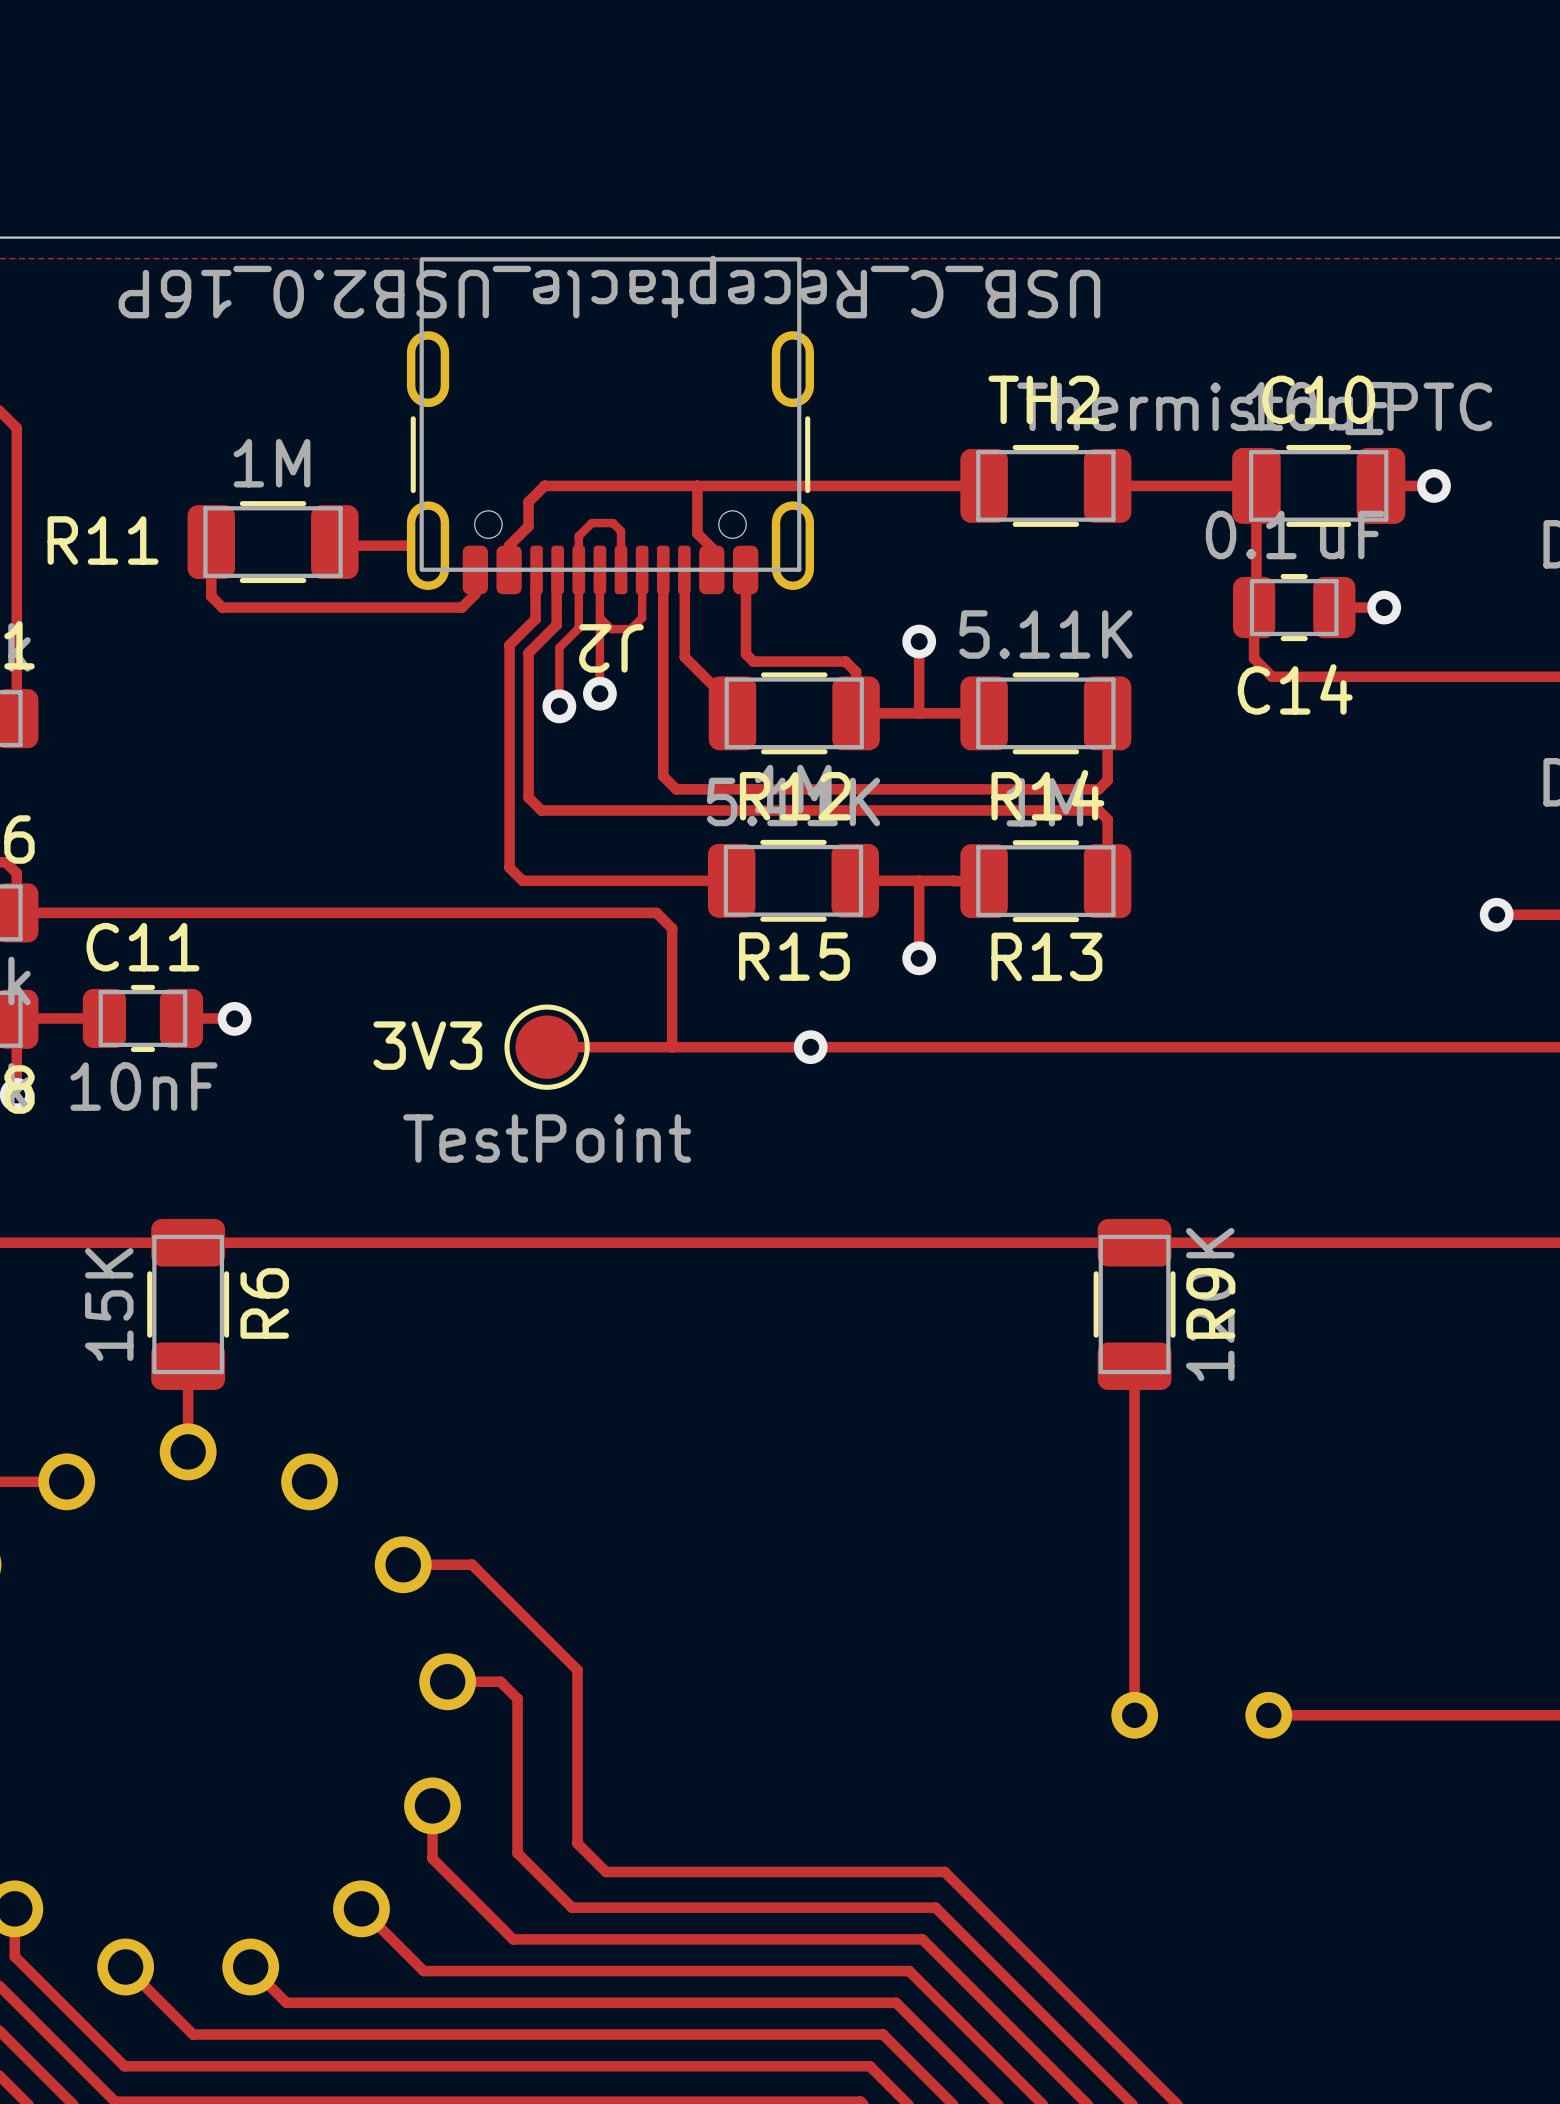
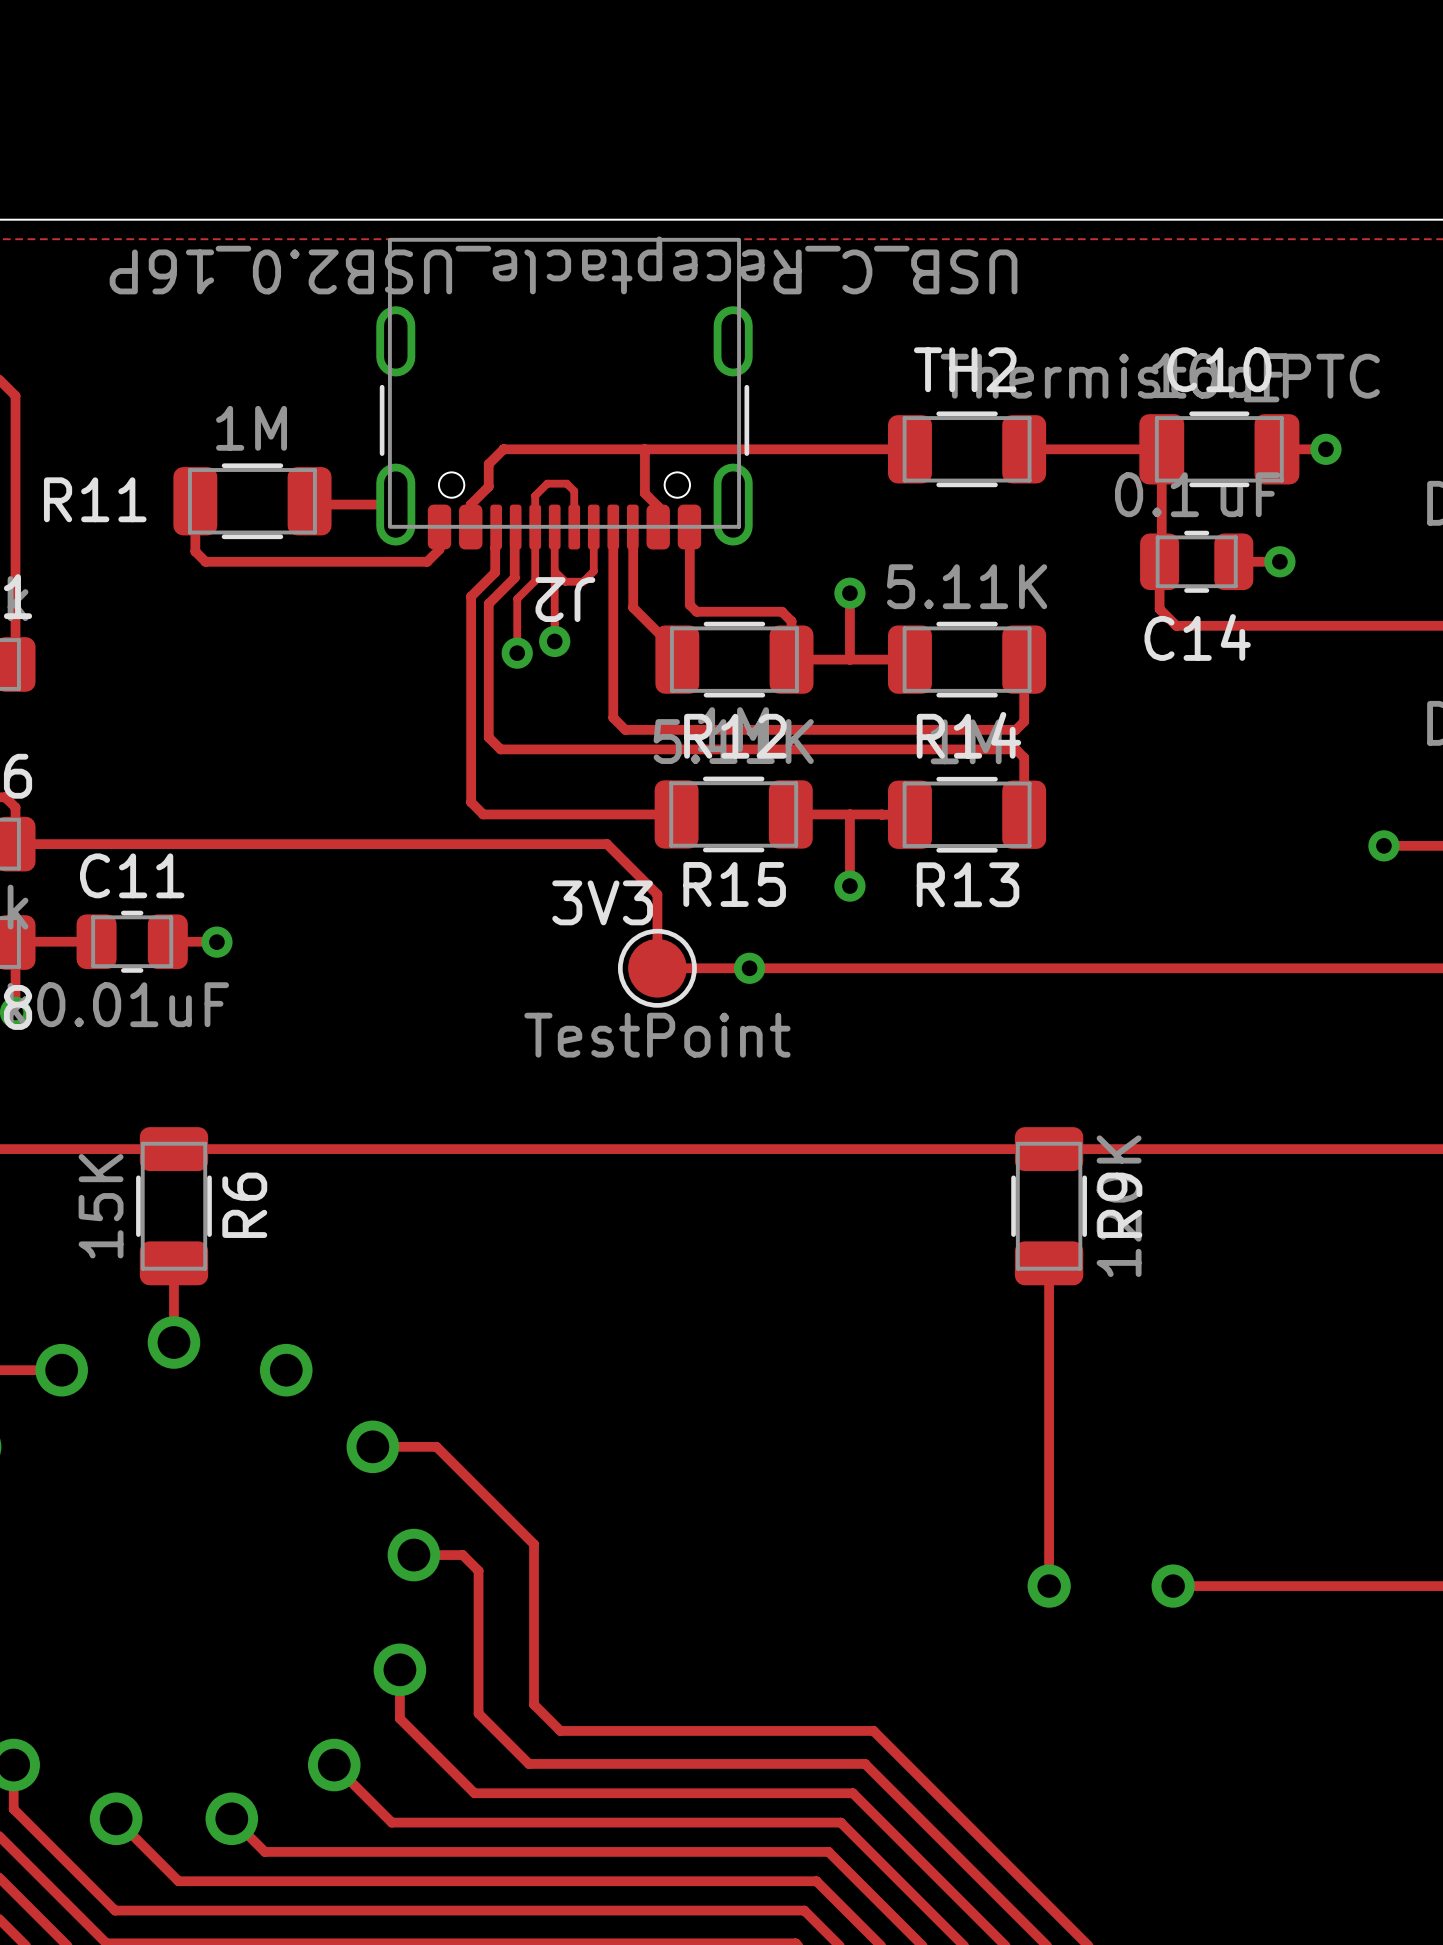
track: (672, 928) (672, 1047) -> (621, 858) (657, 894) (657, 968)
3V3 name position: 3V3 (427, 1045) -> 3V3 (602, 902)
track: (547, 1047) (710, 1047) -> none
3V3 position: (547, 1047) -> (657, 968)
C11 value: 10nF (143, 1086) -> 0.01uF (133, 1004)
3V3 value position: TestPoint (547, 1138) -> TestPoint (657, 1035)

